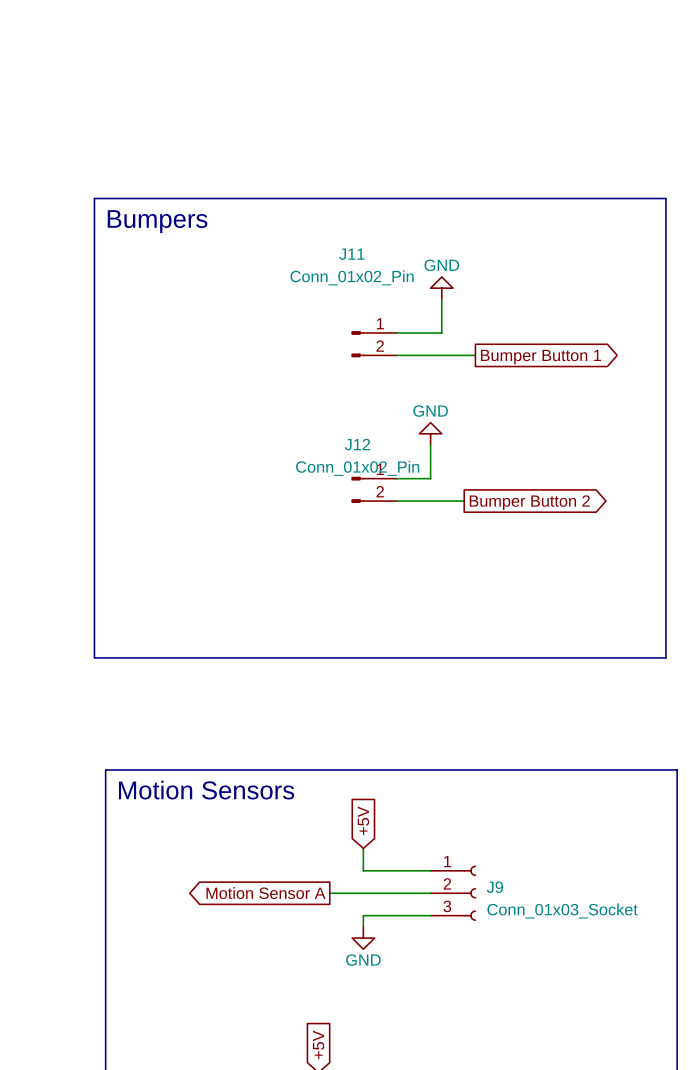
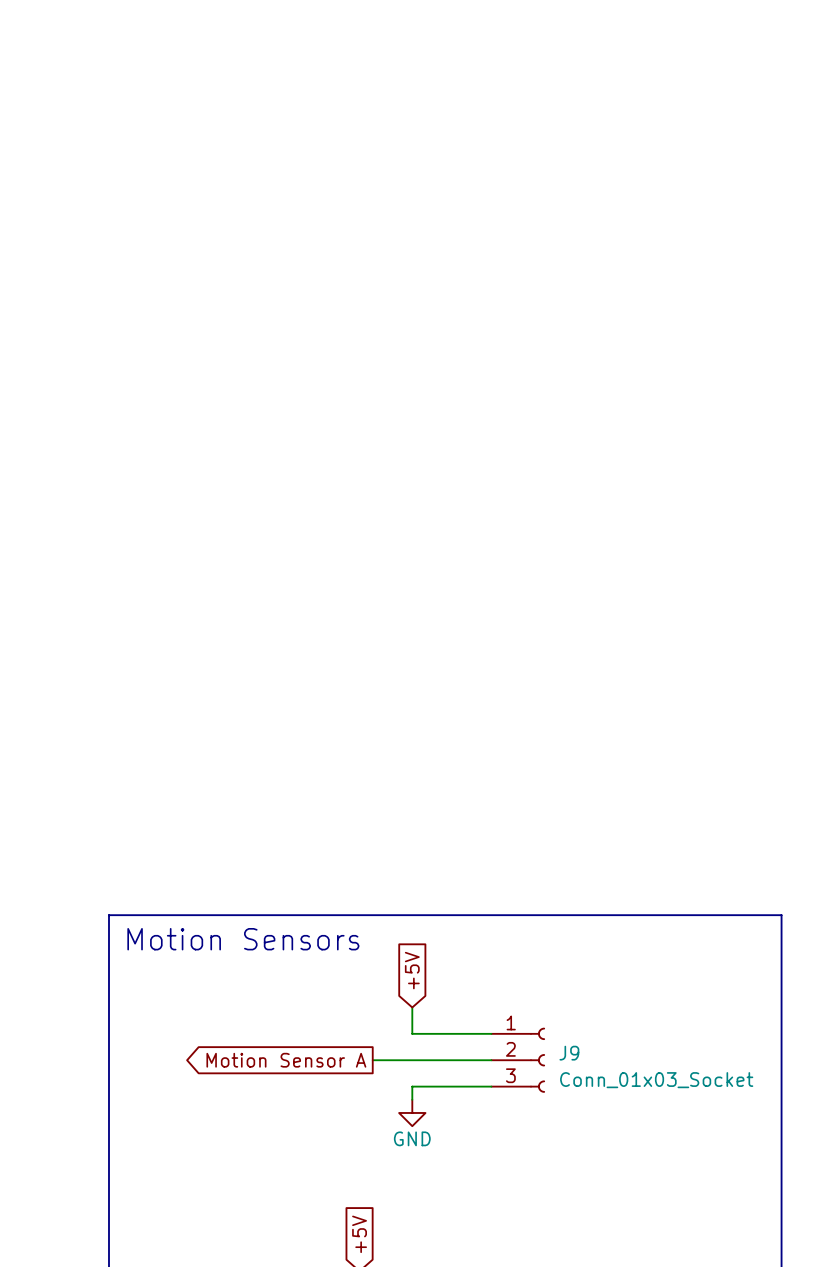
line: (94, 198) (665, 198) (665, 657) (94, 657) (94, 198) -> none
text: Bumpers (157, 221) -> none
power symbol: GND (441, 288) -> none
wire: (441, 299) (441, 332) (396, 332) -> none
J11: Conn_01x02_Pin (374, 344) -> none
wire: (396, 355) (475, 355) -> none
global label: Bumper Button 1 (541, 357) -> none
power symbol: GND (430, 433) -> none
wire: (430, 445) (430, 478) (396, 478) -> none
J12: Conn_01x02_Pin (374, 489) -> none
wire: (396, 501) (464, 501) -> none
global label: Bumper Button 2 (529, 502) -> none

